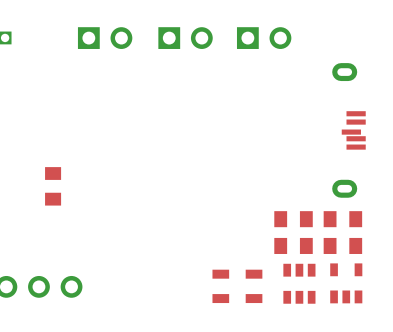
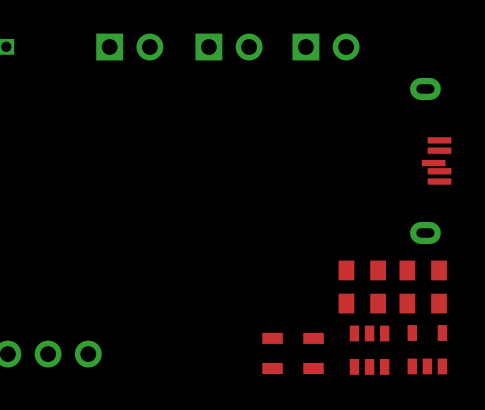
part: (53, 186) -> none

